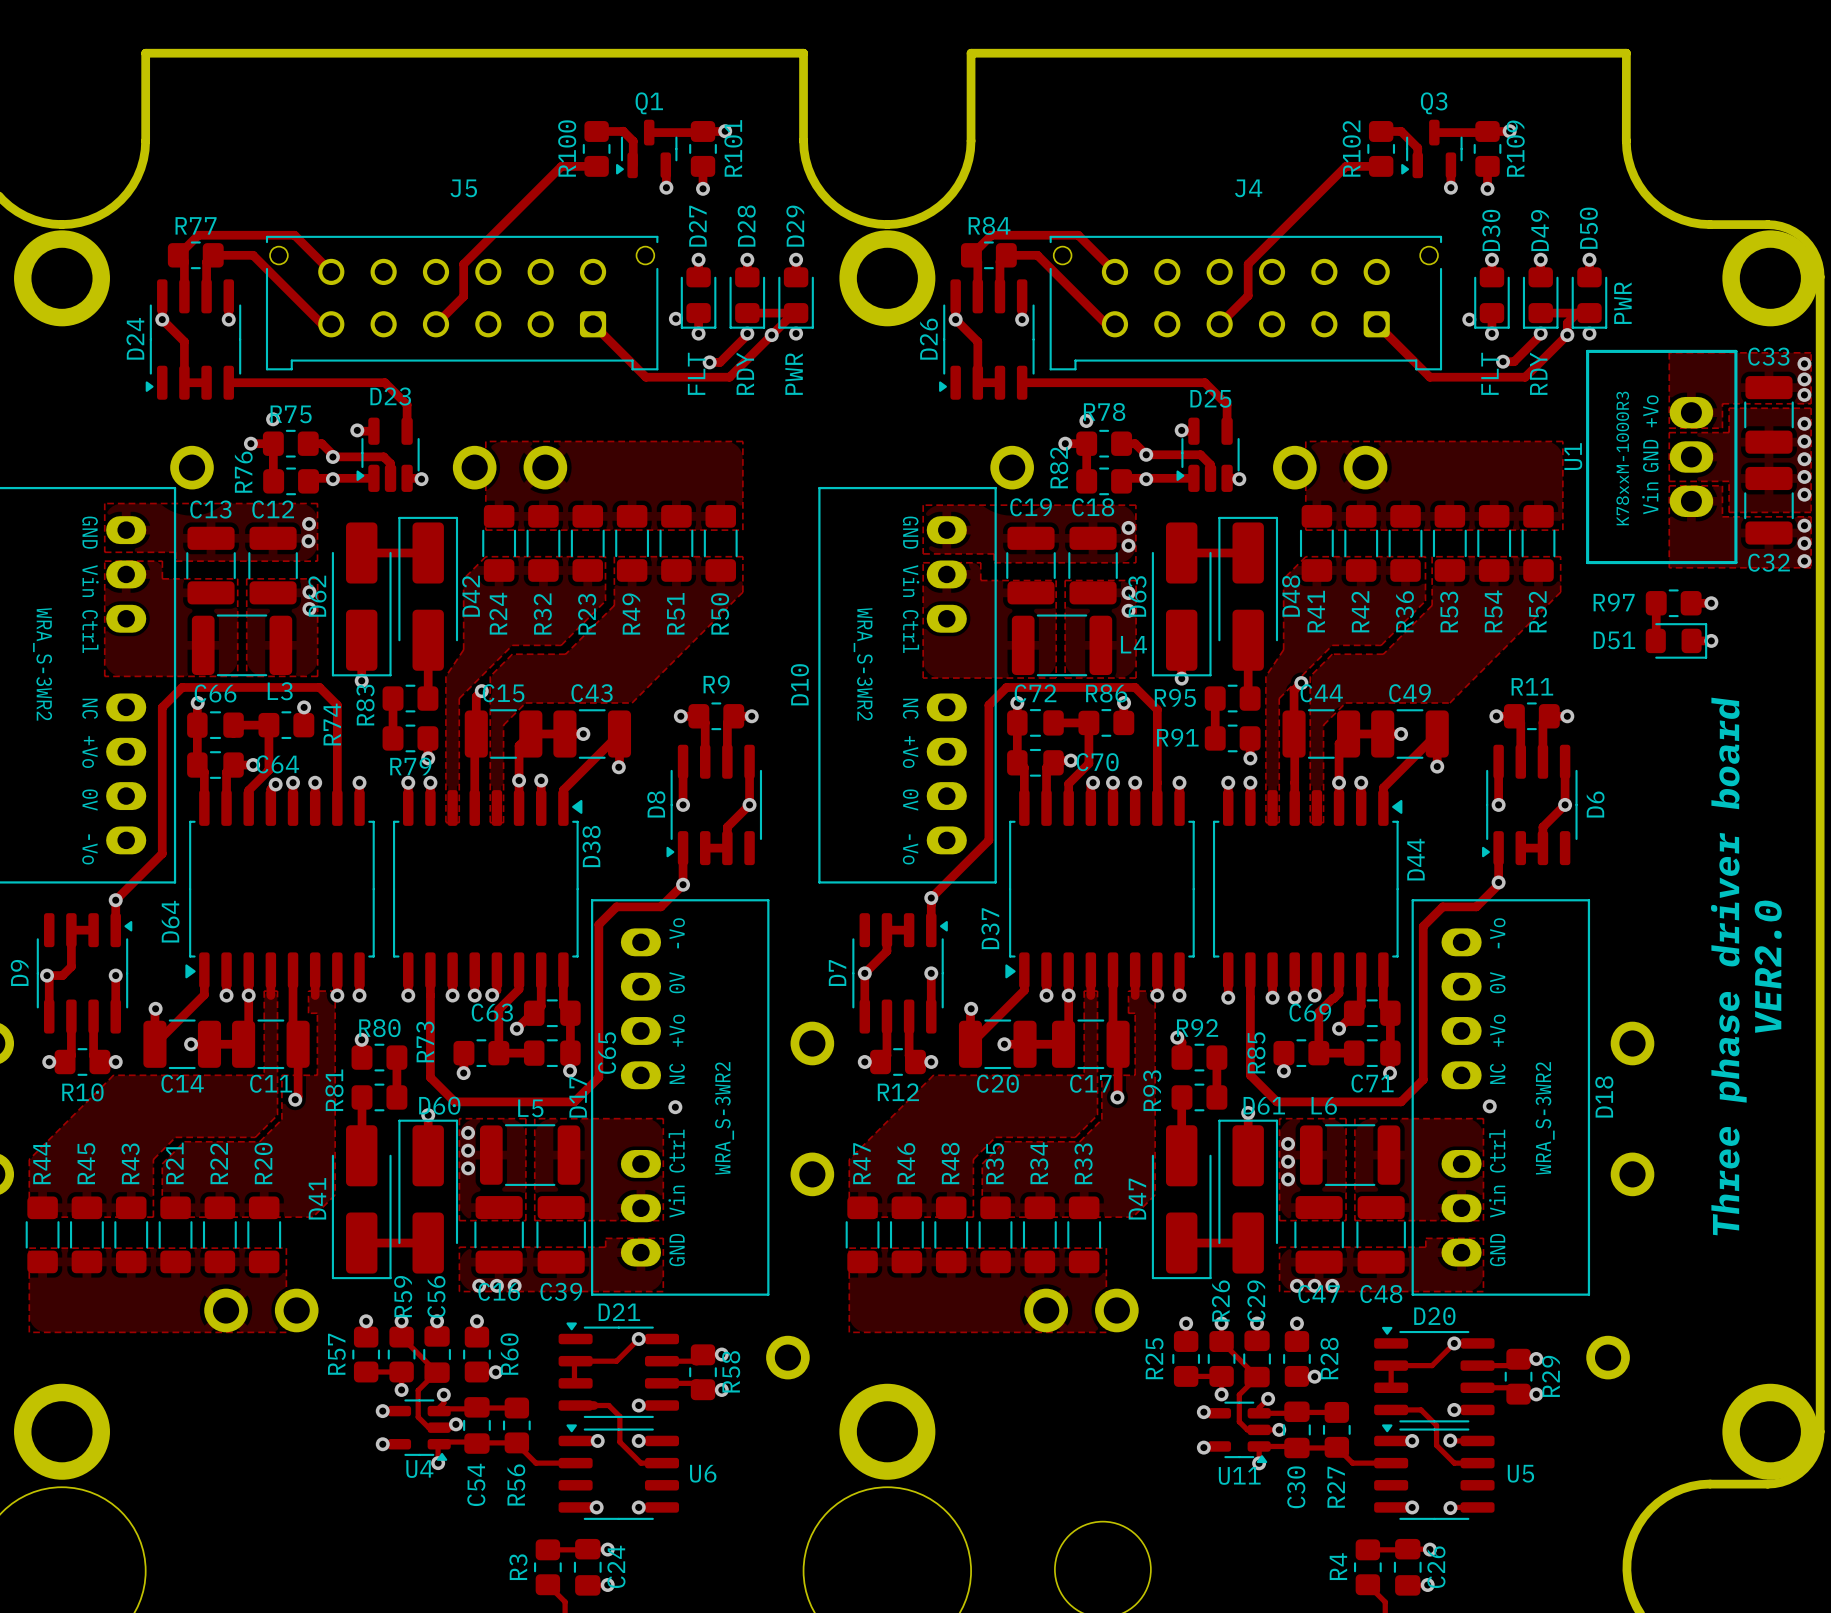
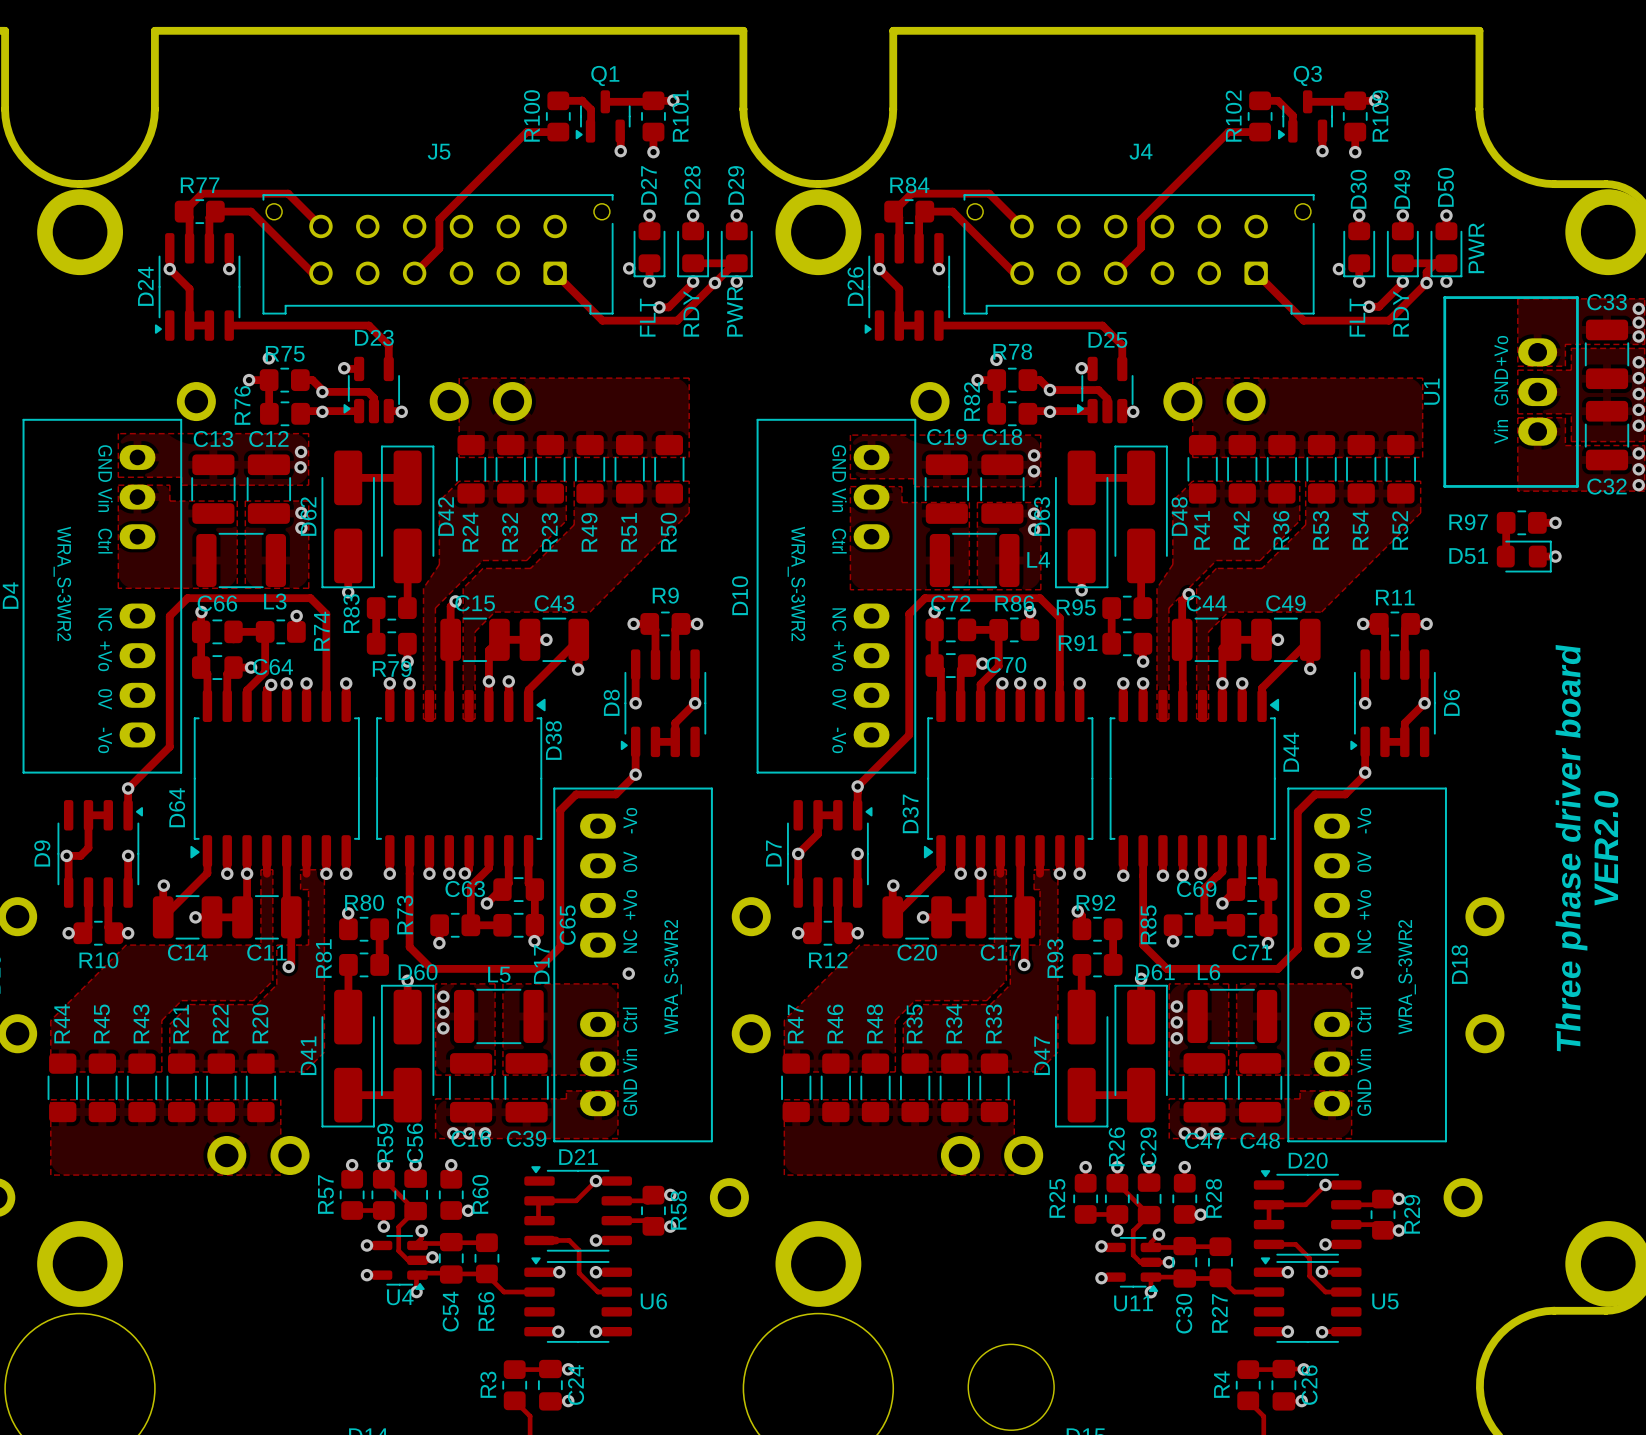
U1 text: K78xxM-1000R3 (1622, 458) -> none

